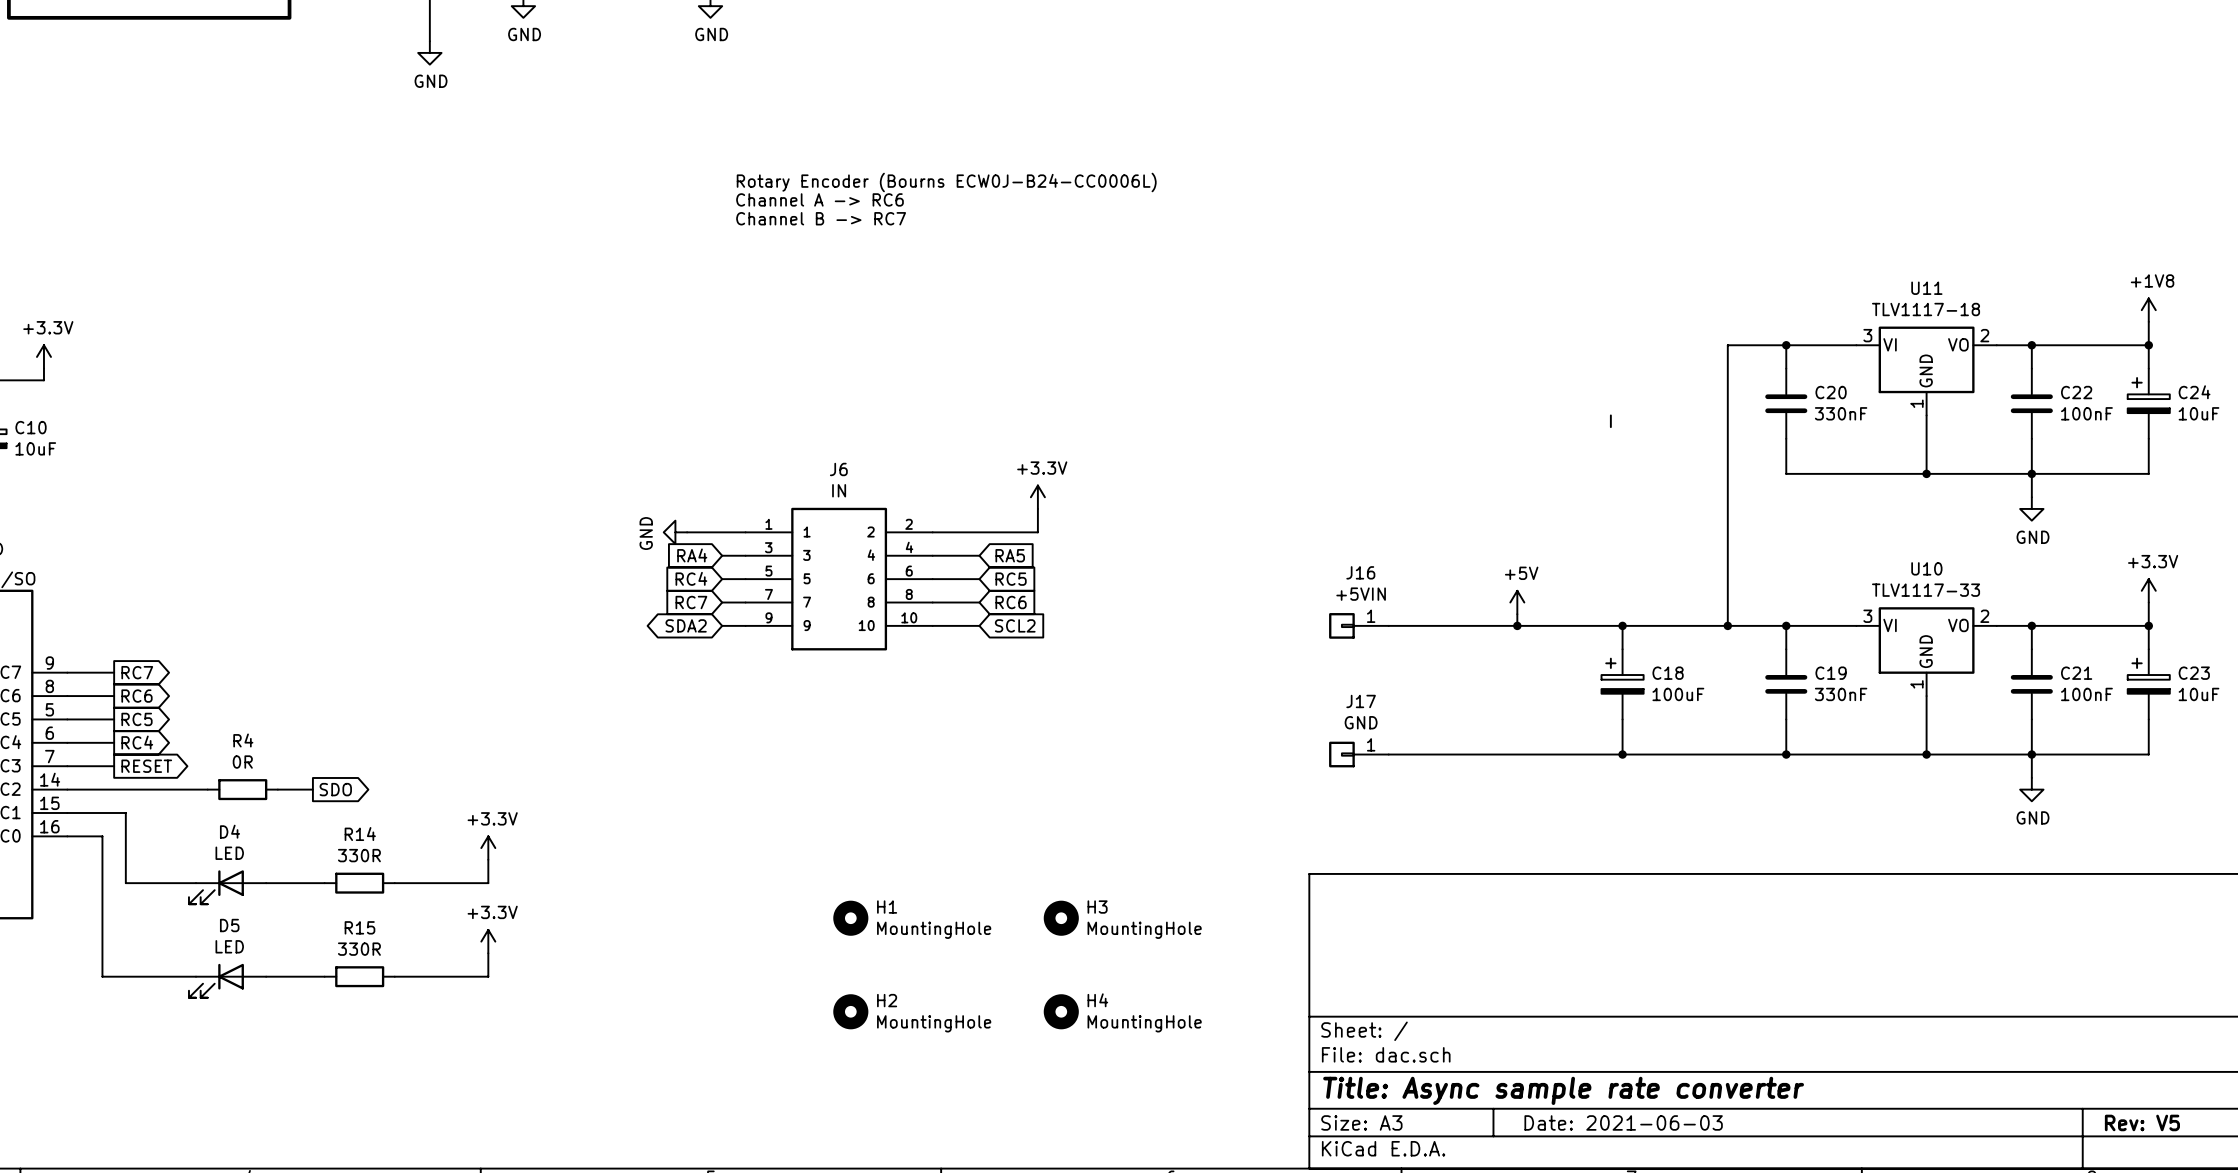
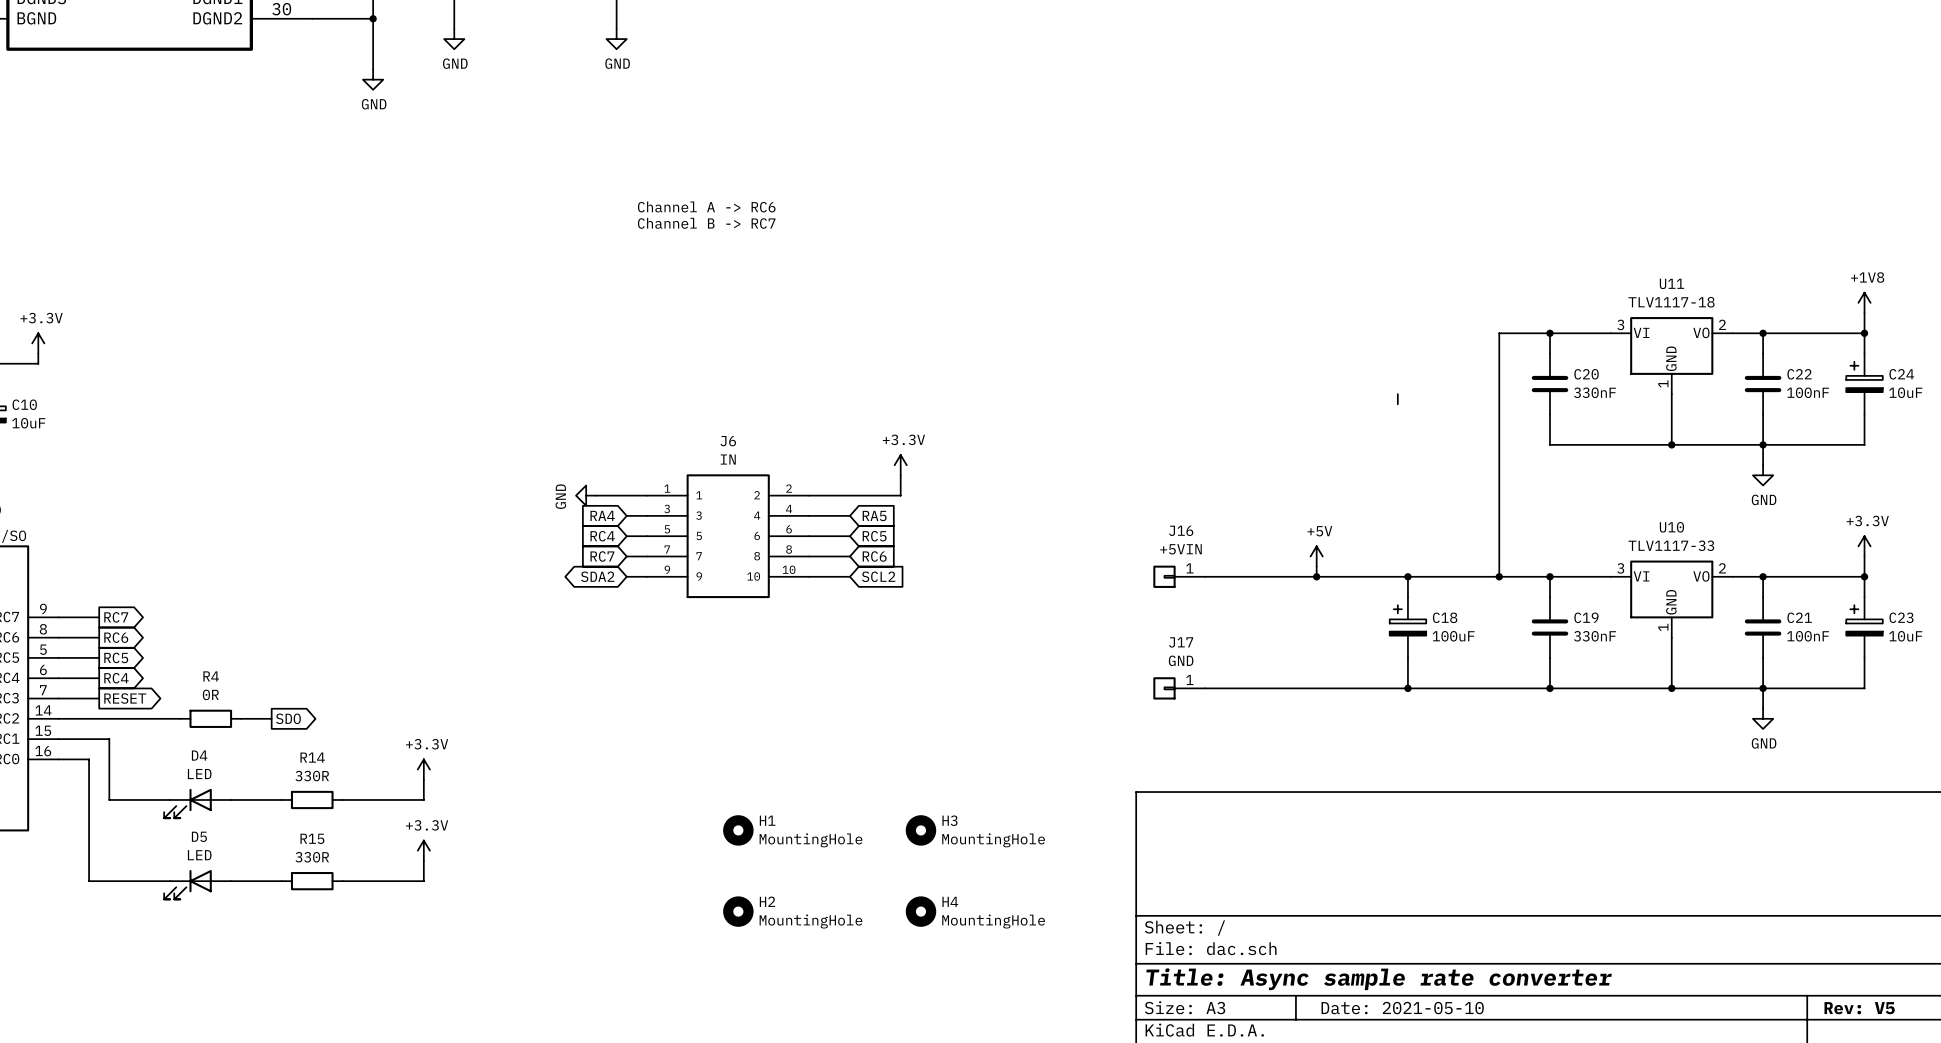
text: Rotary Encoder (Bourns ECW0J-B24-CC0006L) (946, 182) -> none
title block: Date: 2021-06-03 (1623, 1122) -> Date: 2021-05-10 (1402, 1008)

